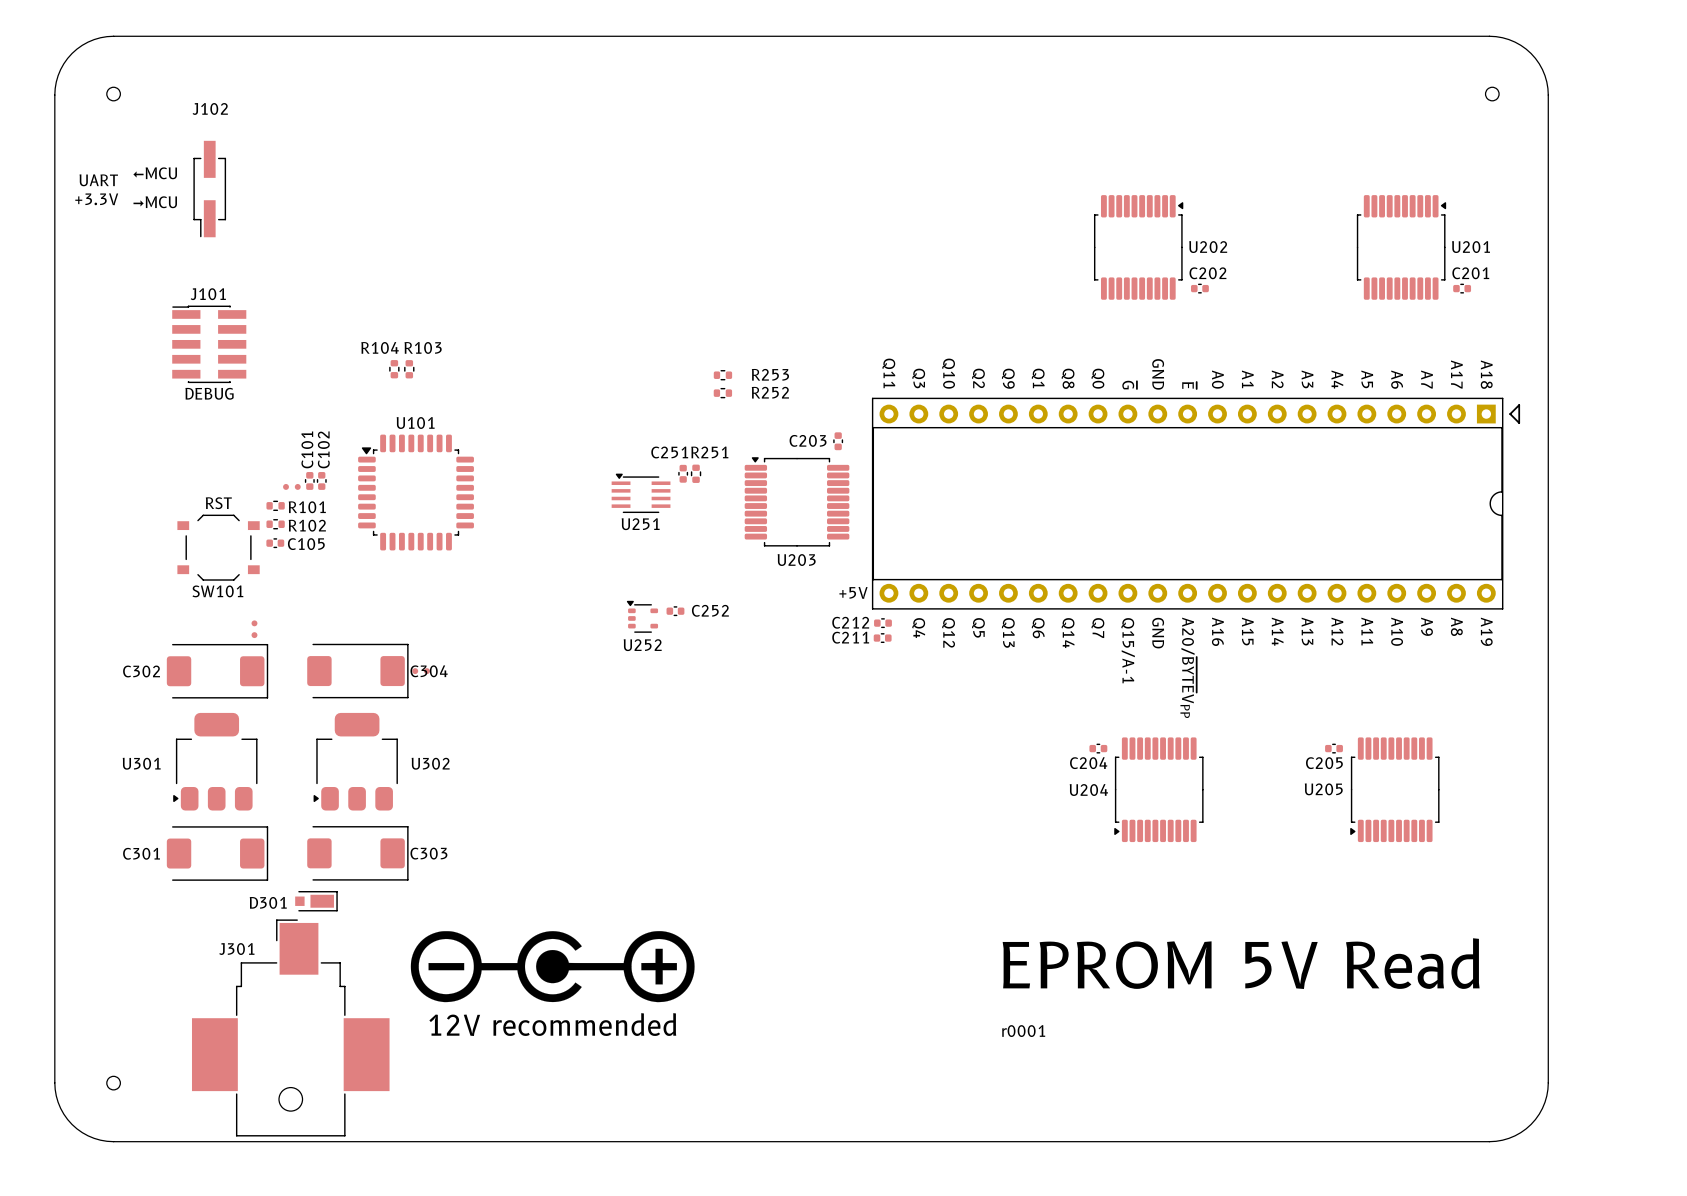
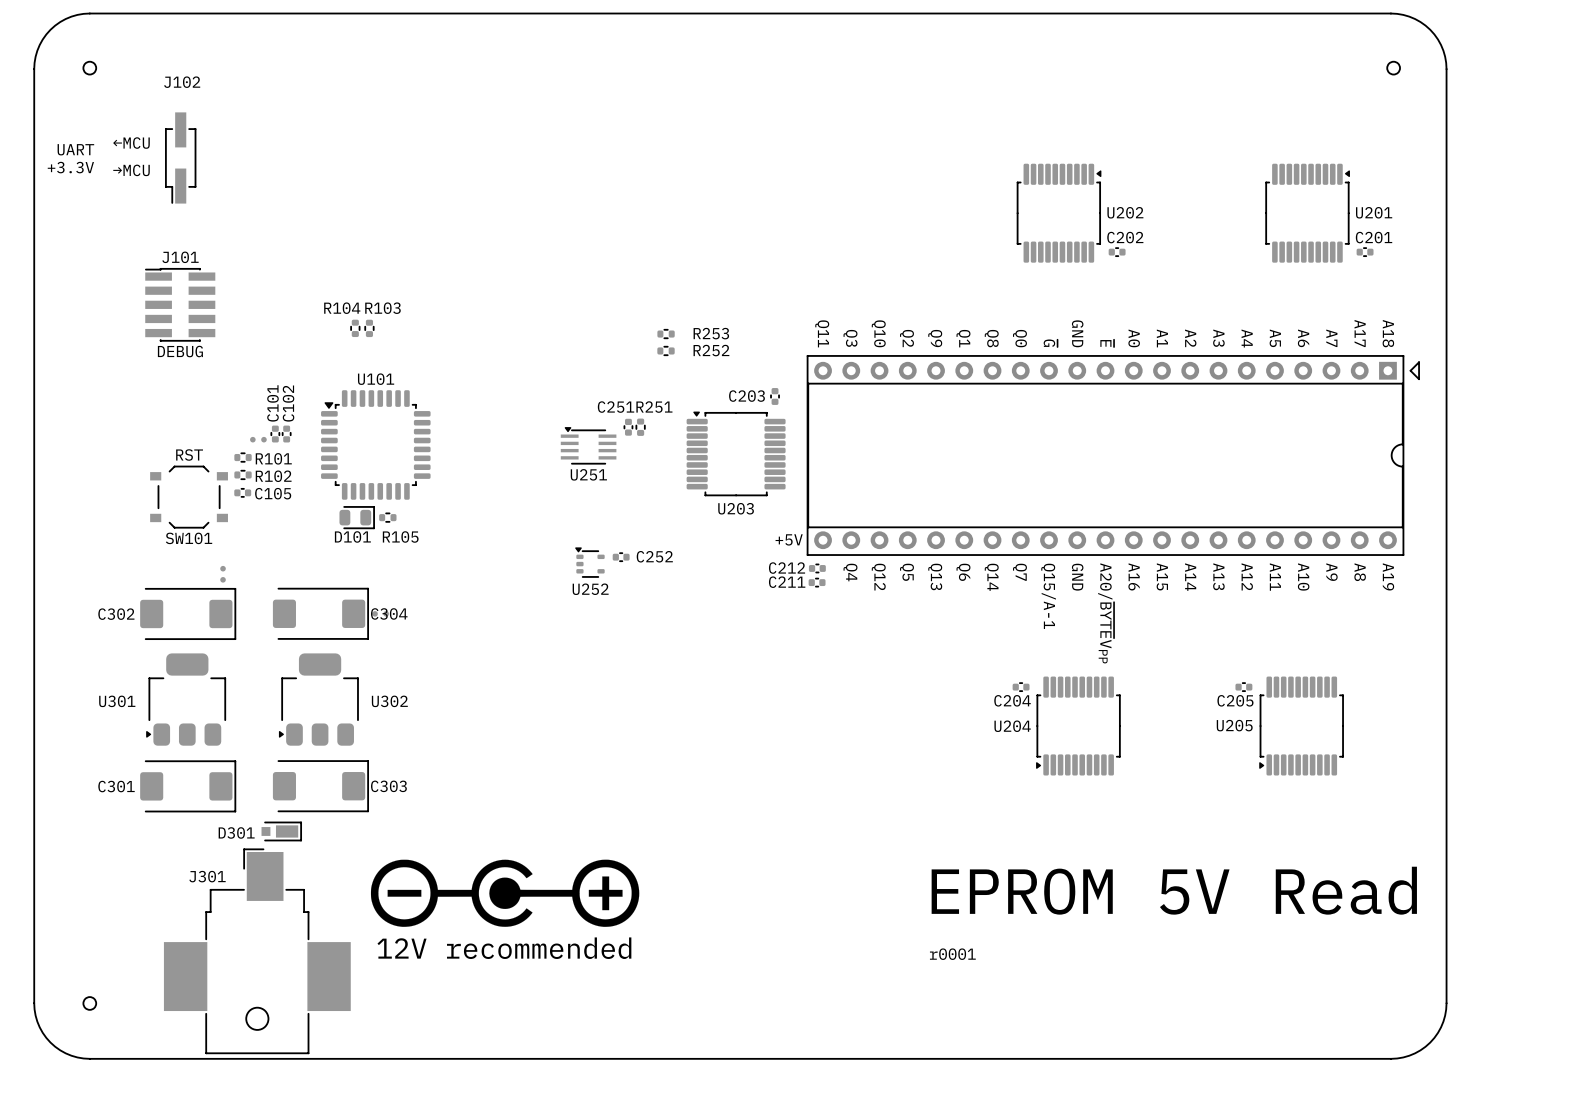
D101: none -> (357, 517)
R105: none -> (387, 517)

